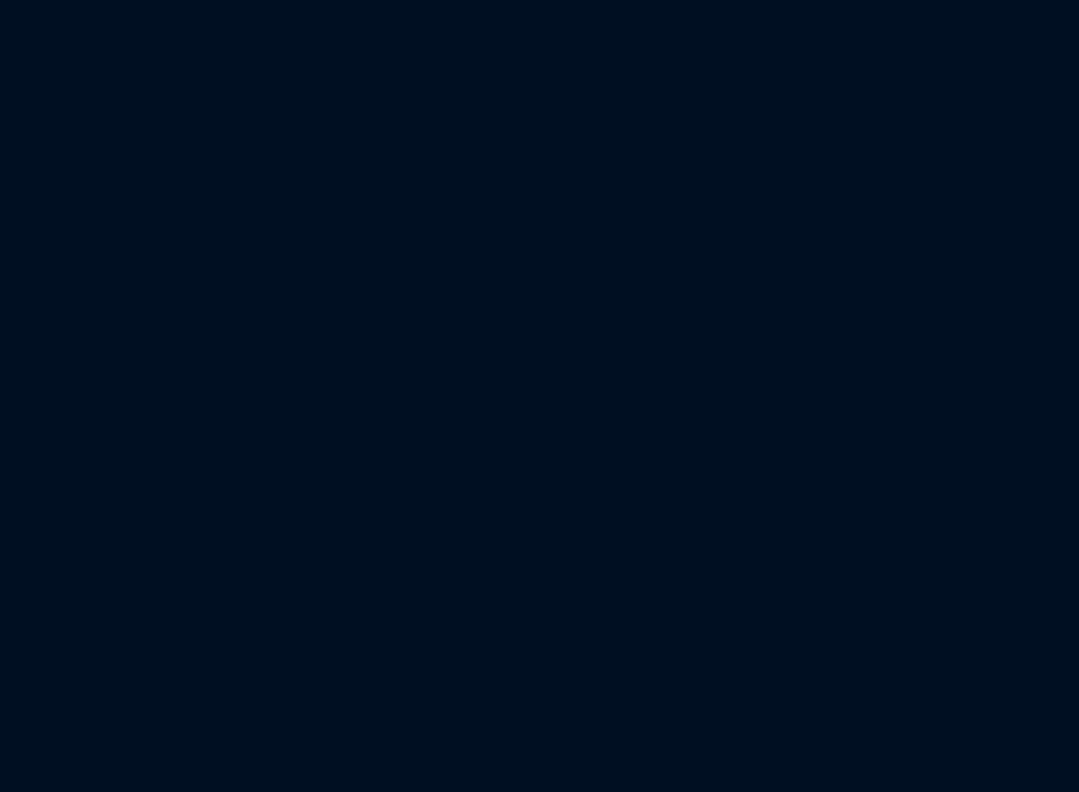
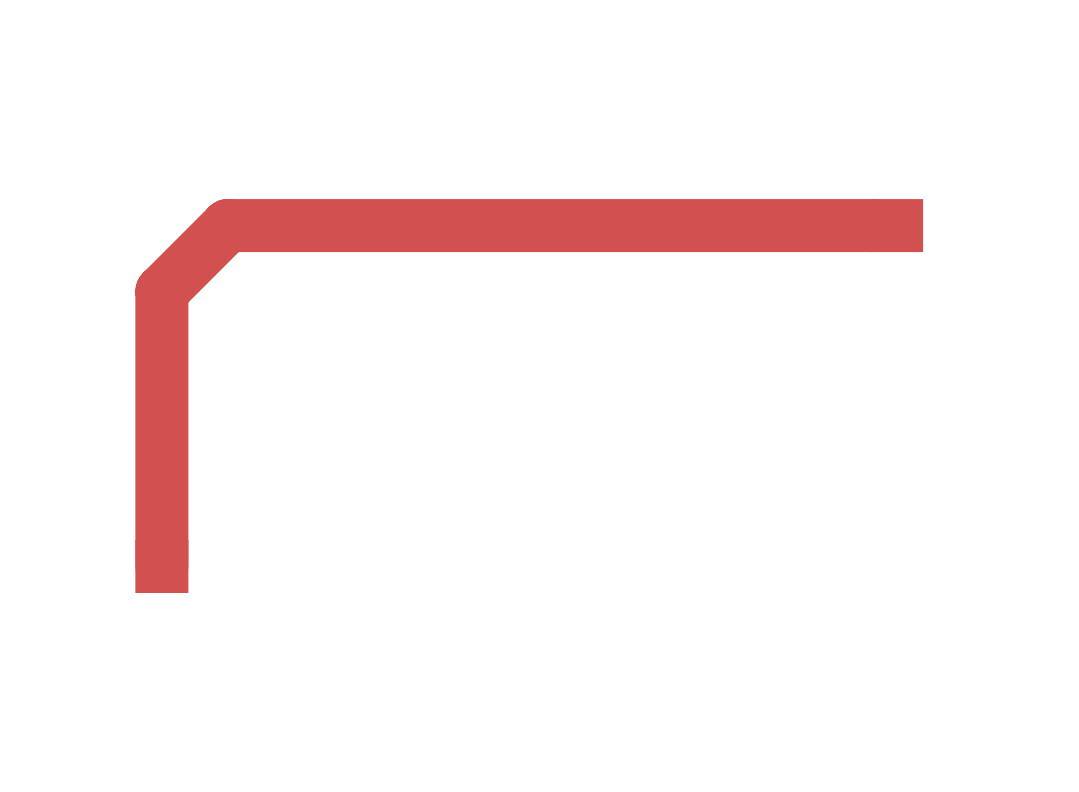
part: none -> (529, 396)

